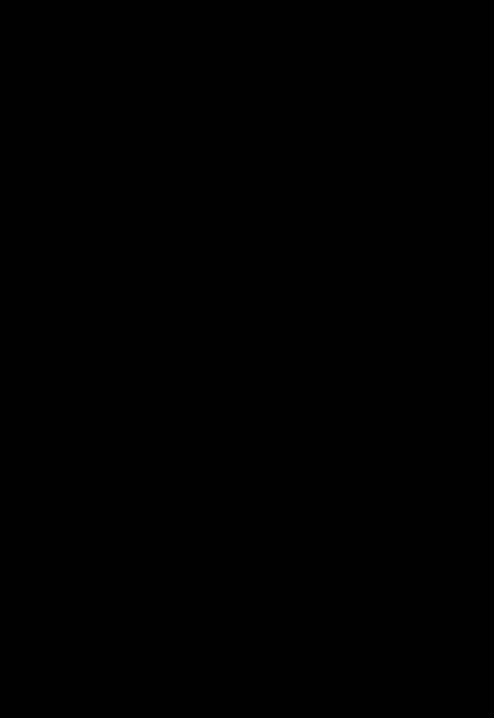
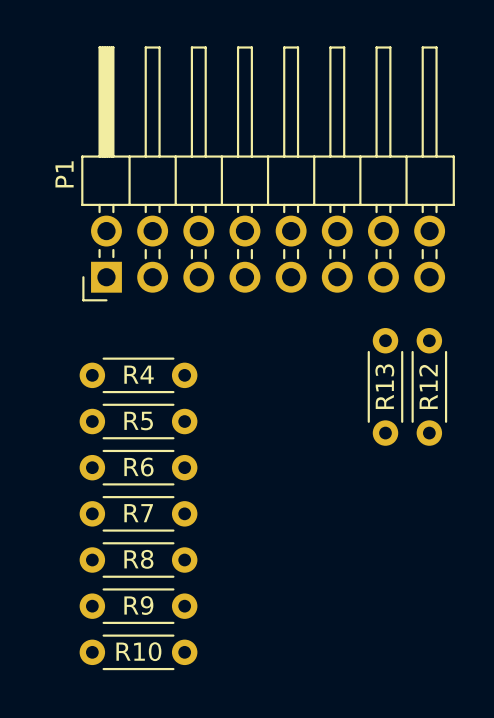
P1: none -> (268, 173)
R4: none -> (138, 375)
R13: none -> (385, 386)
R12: none -> (429, 386)
R5: none -> (138, 421)
R6: none -> (138, 467)
R7: none -> (138, 513)
R8: none -> (138, 560)
R9: none -> (138, 606)
R10: none -> (138, 652)

